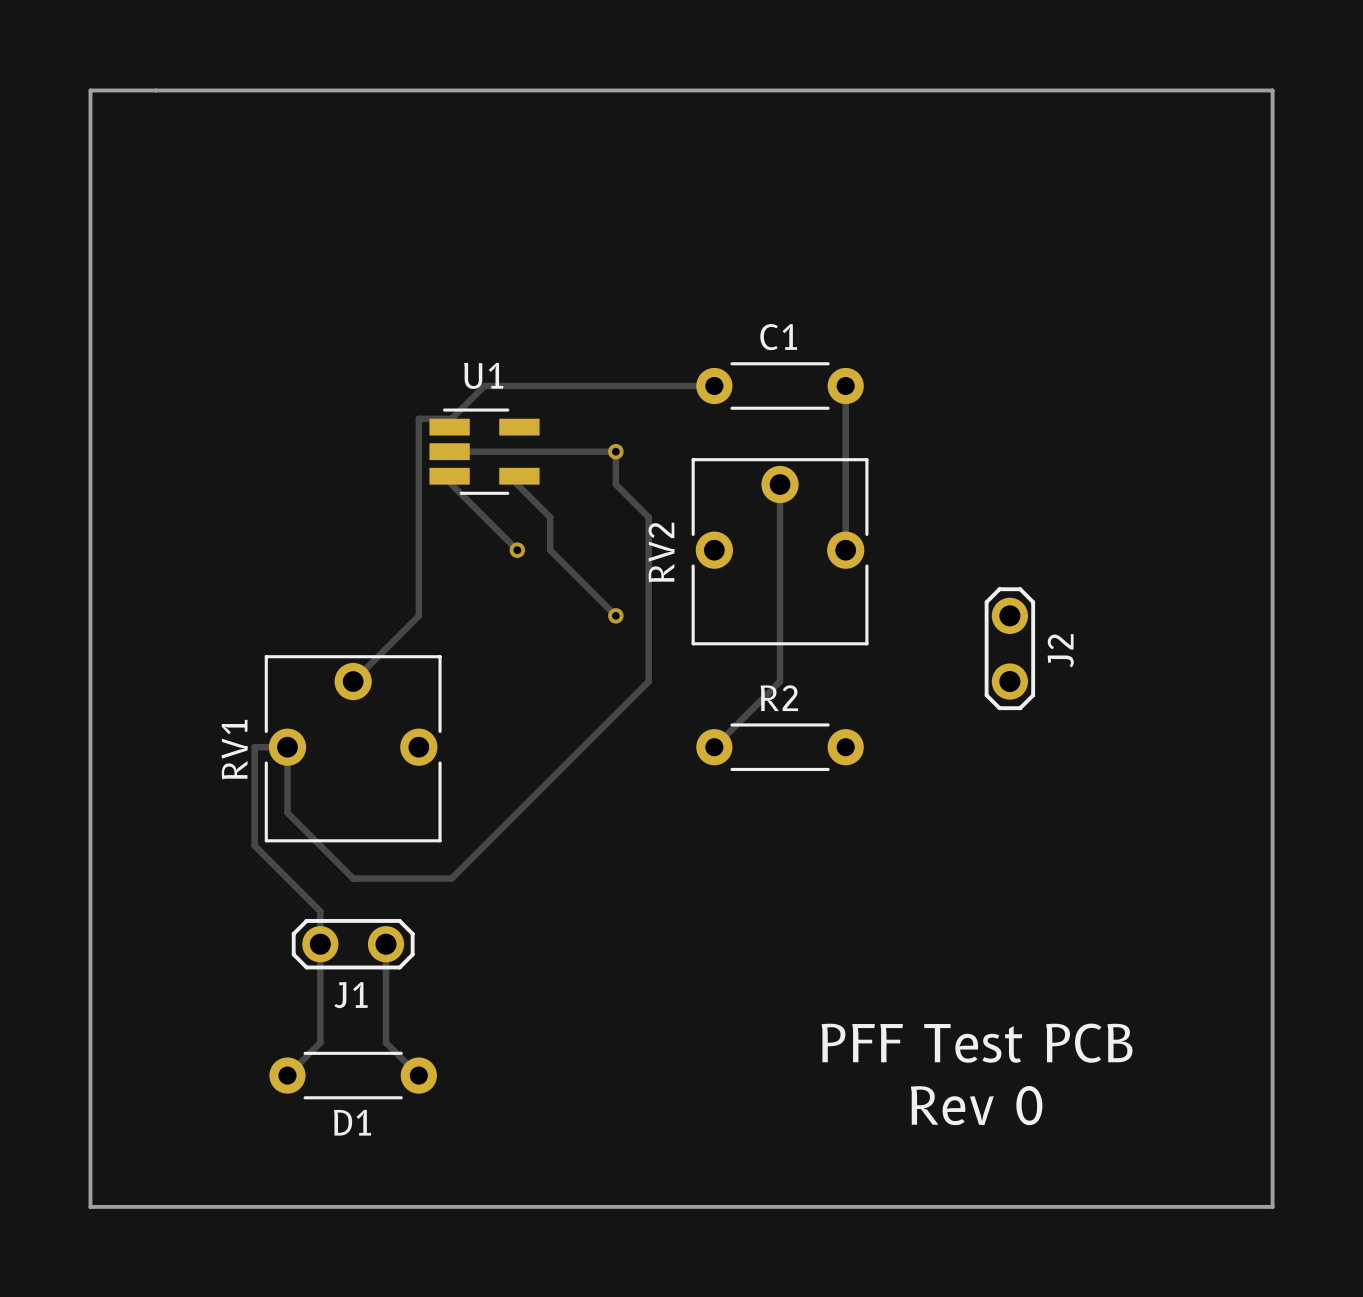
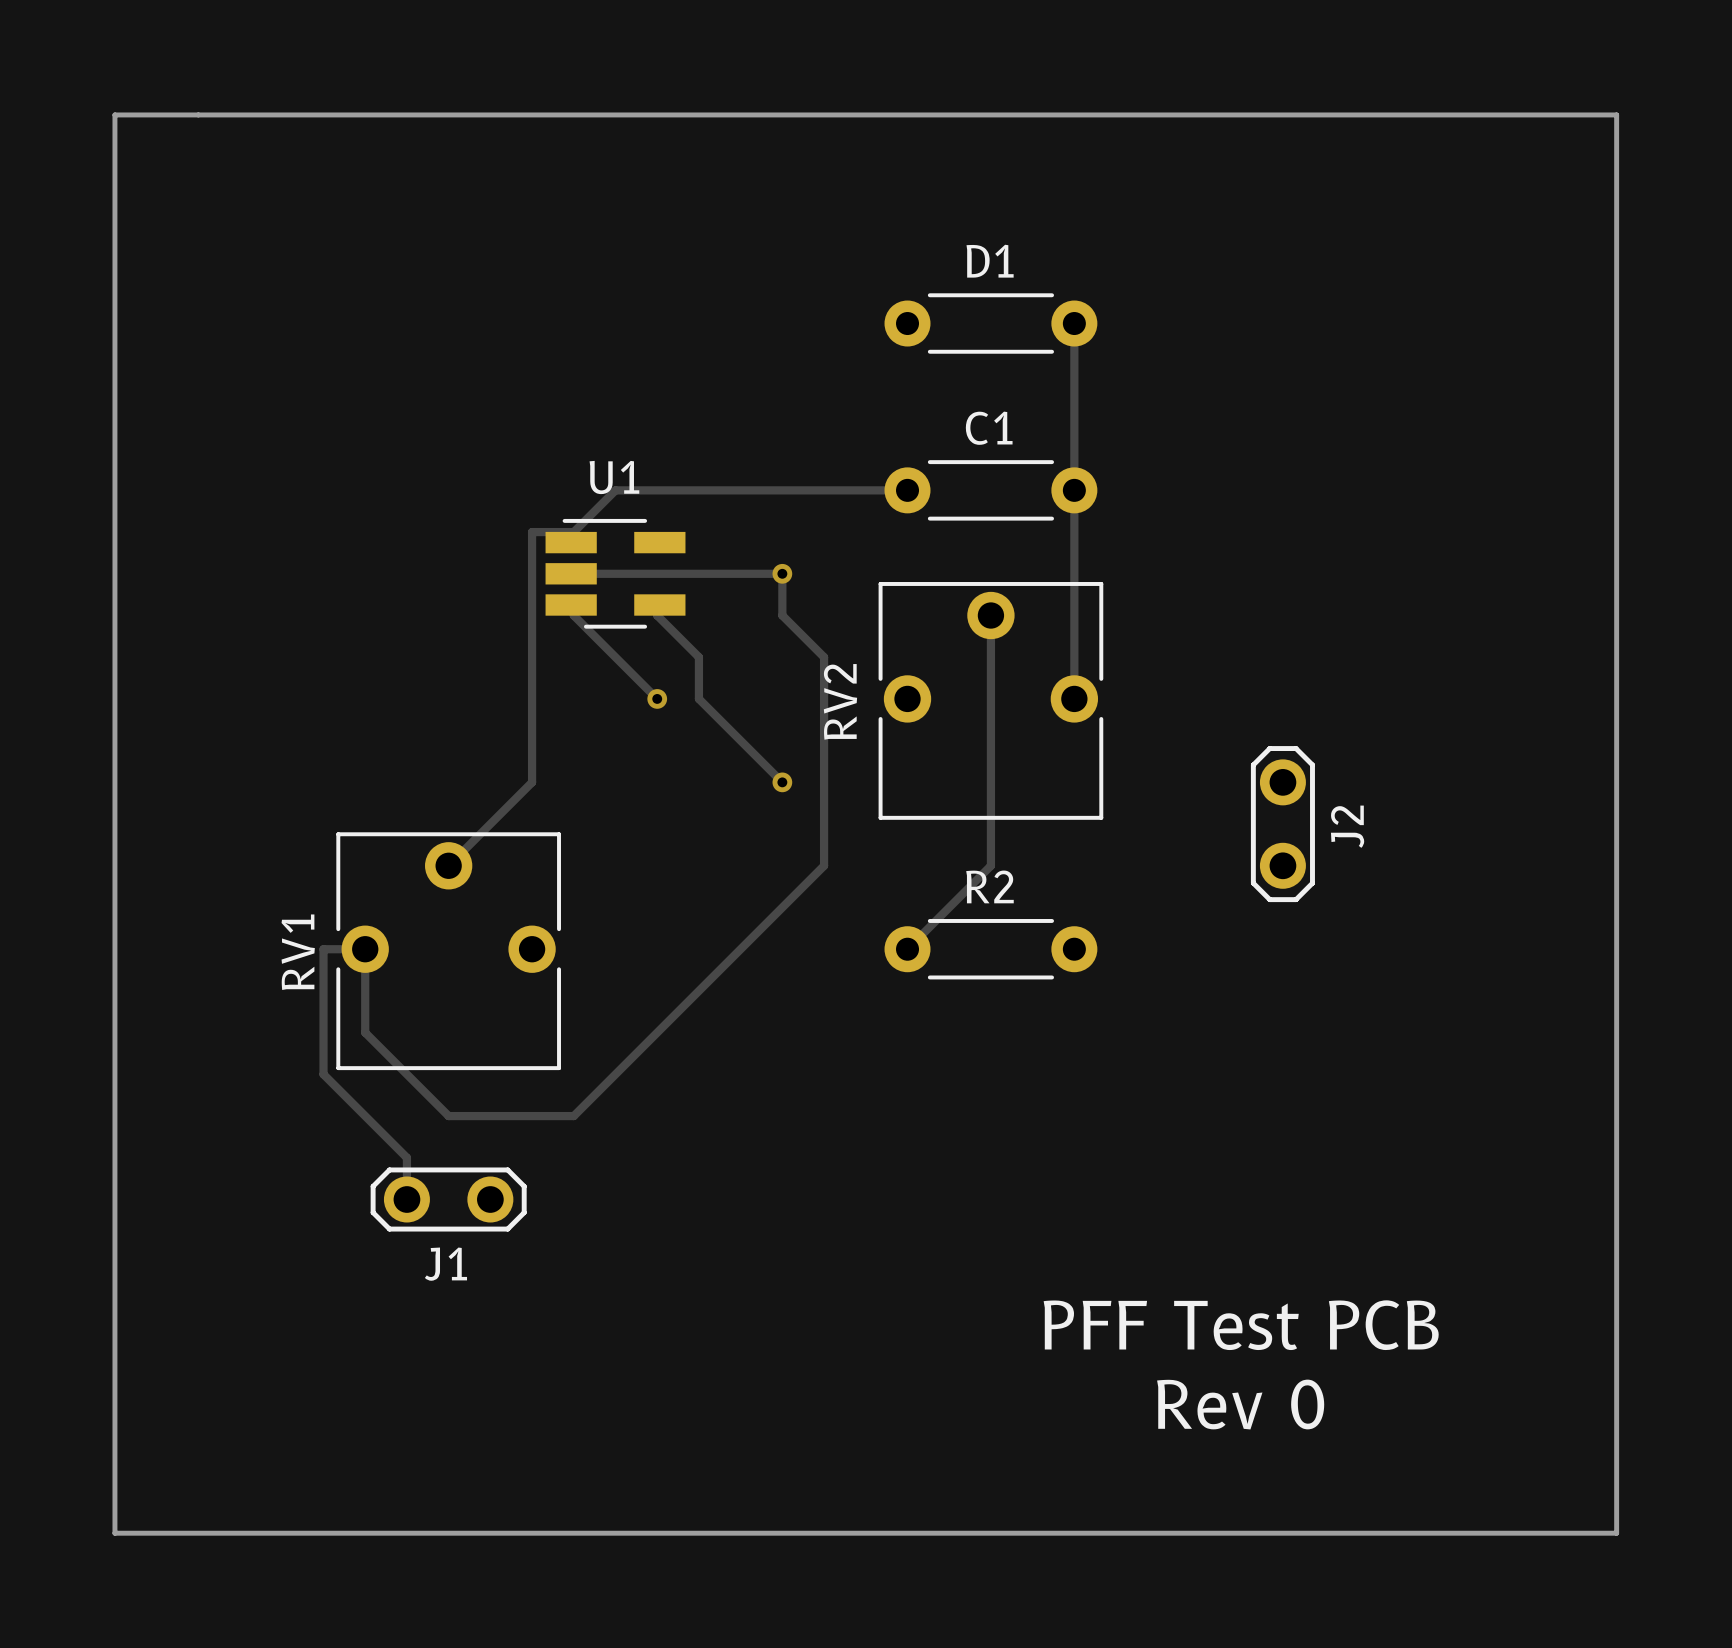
track: none -> (1074, 323) (1074, 490)
track: (320, 944) (320, 1042) (287, 1075) -> none
track: (386, 944) (386, 1042) (418, 1075) -> none
D1 position: (353, 1075) -> (990, 323)
D1 name position: D1 (352, 1122) -> D1 (990, 261)

